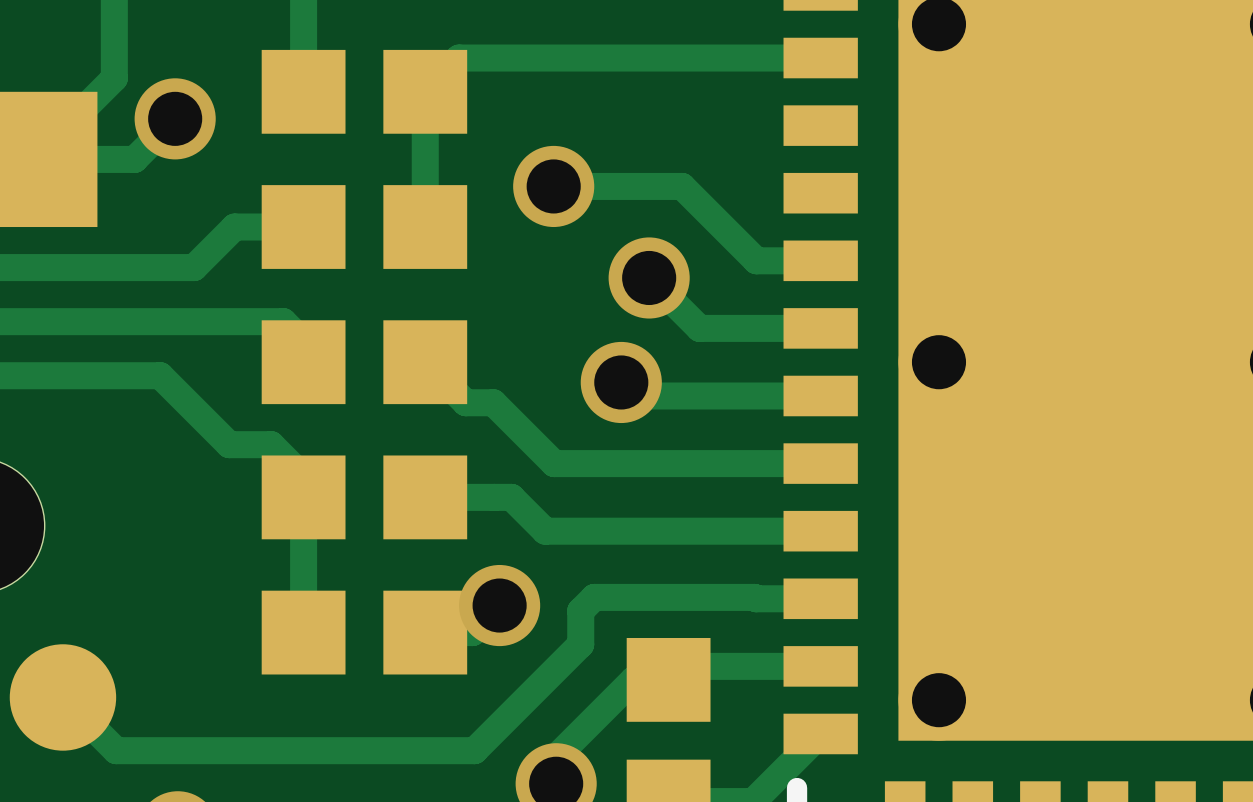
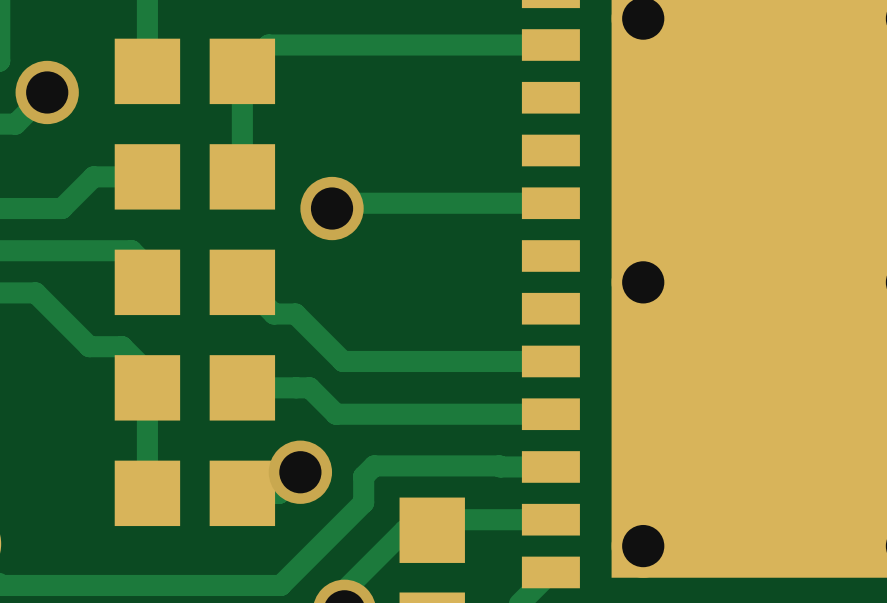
track: (553, 186) (682, 186) (756, 260) -> (332, 208) (337, 203) (500, 203)
via position: (553, 186) -> (332, 208)
track: (649, 277) (699, 328) (820, 328) -> none
via: (649, 277) -> none
track: (621, 382) (634, 396) (820, 396) -> none
via: (621, 382) -> none

